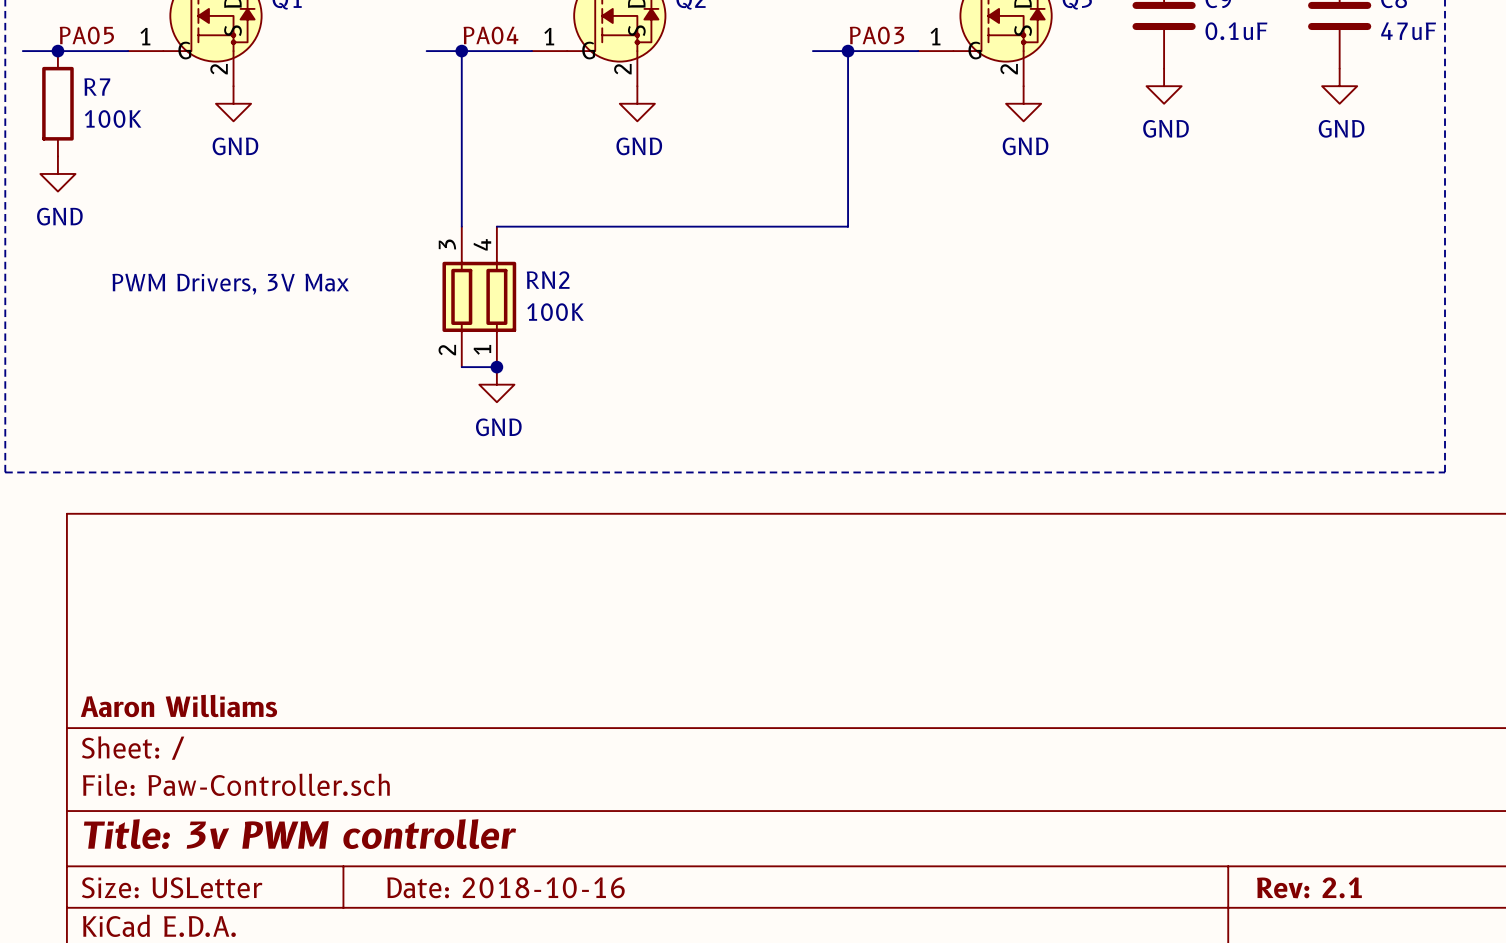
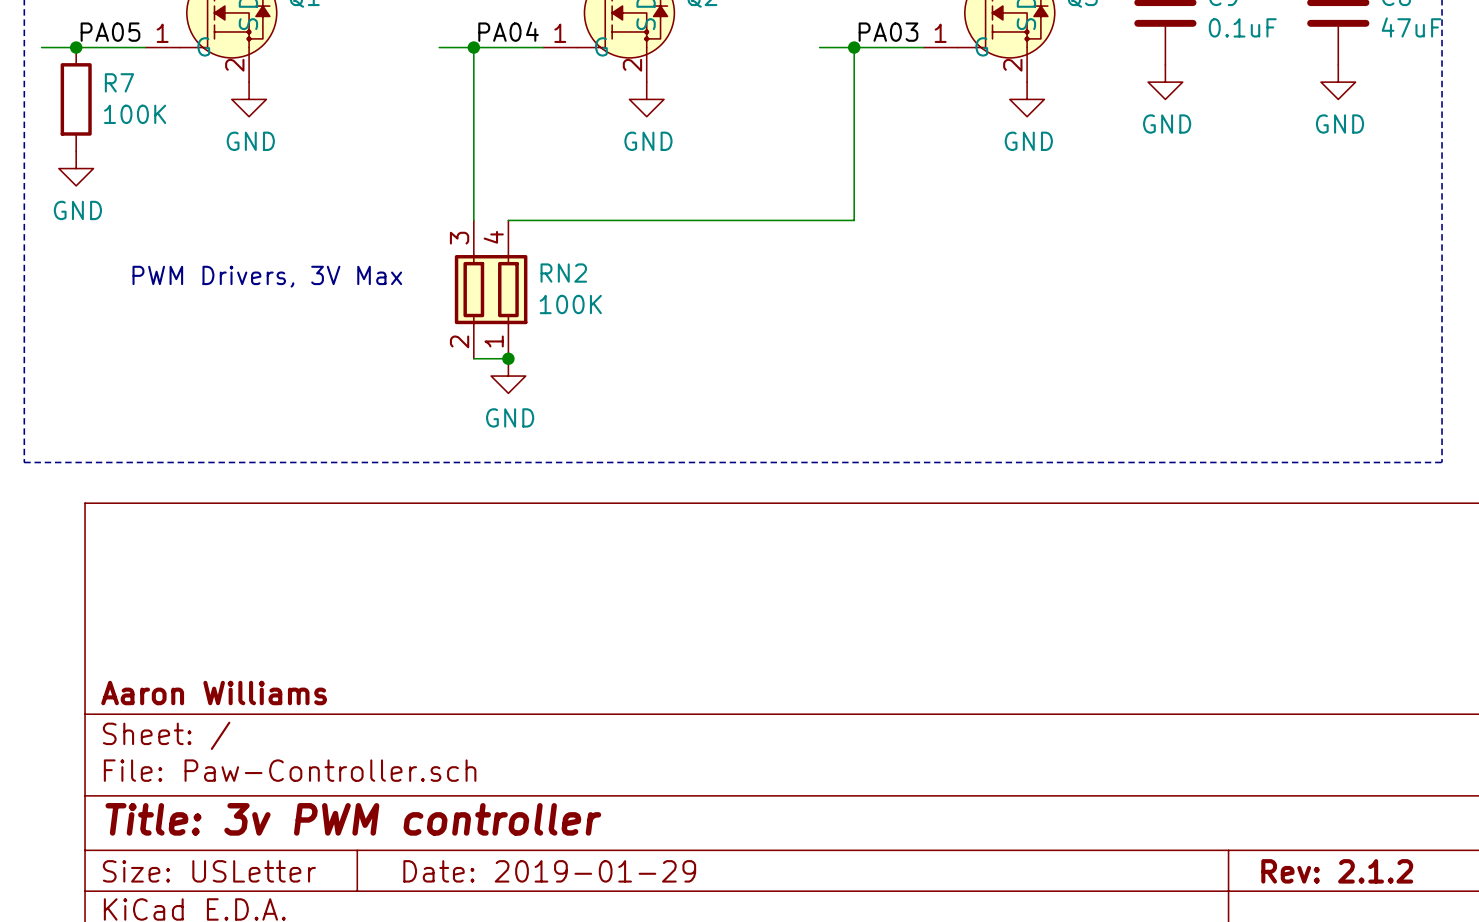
title block: Date: 2018-10-16 (505, 887) -> Date: 2019-01-29 (549, 871)
title block: Rev: 2.1 (1309, 887) -> Rev: 2.1.2 (1337, 871)

